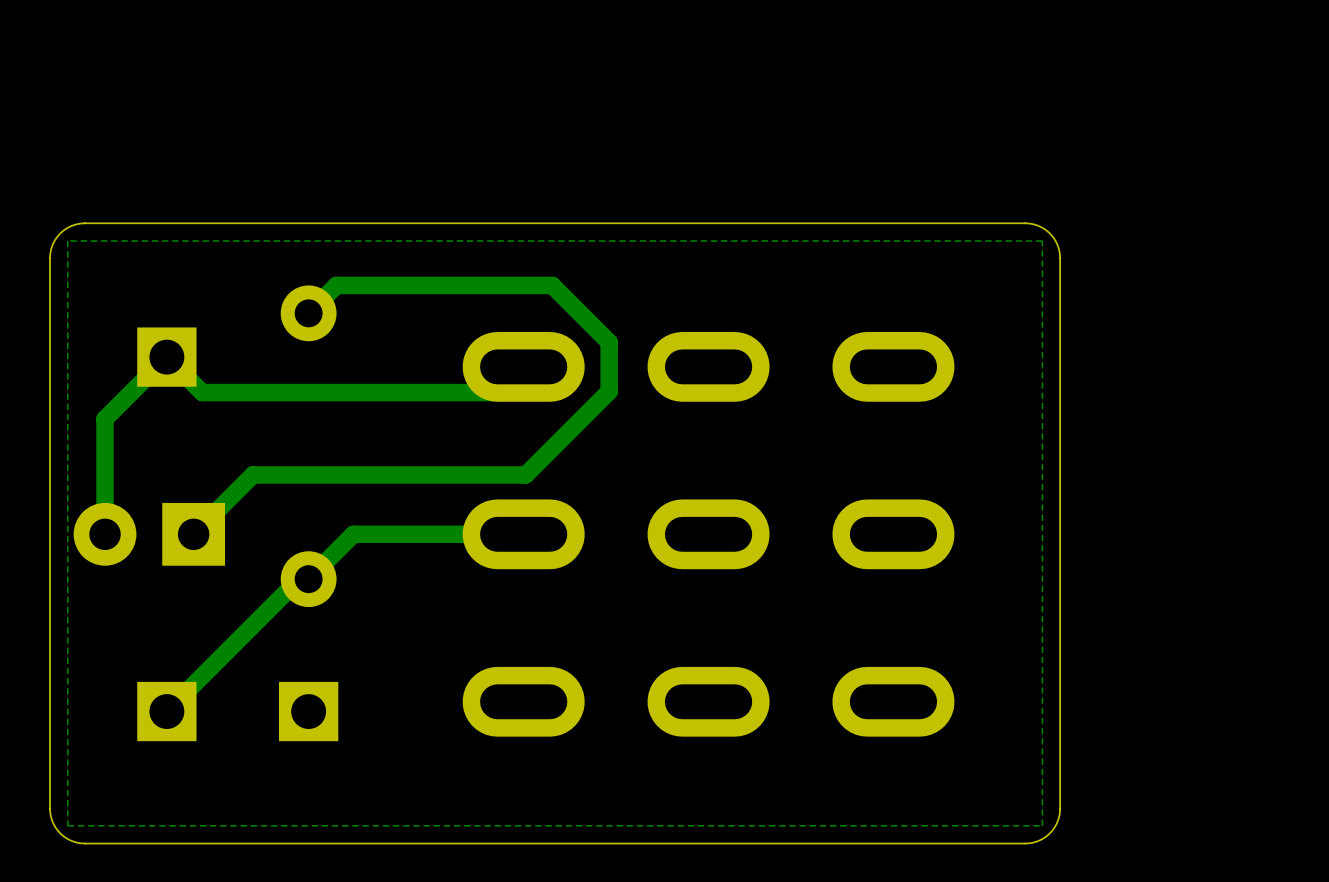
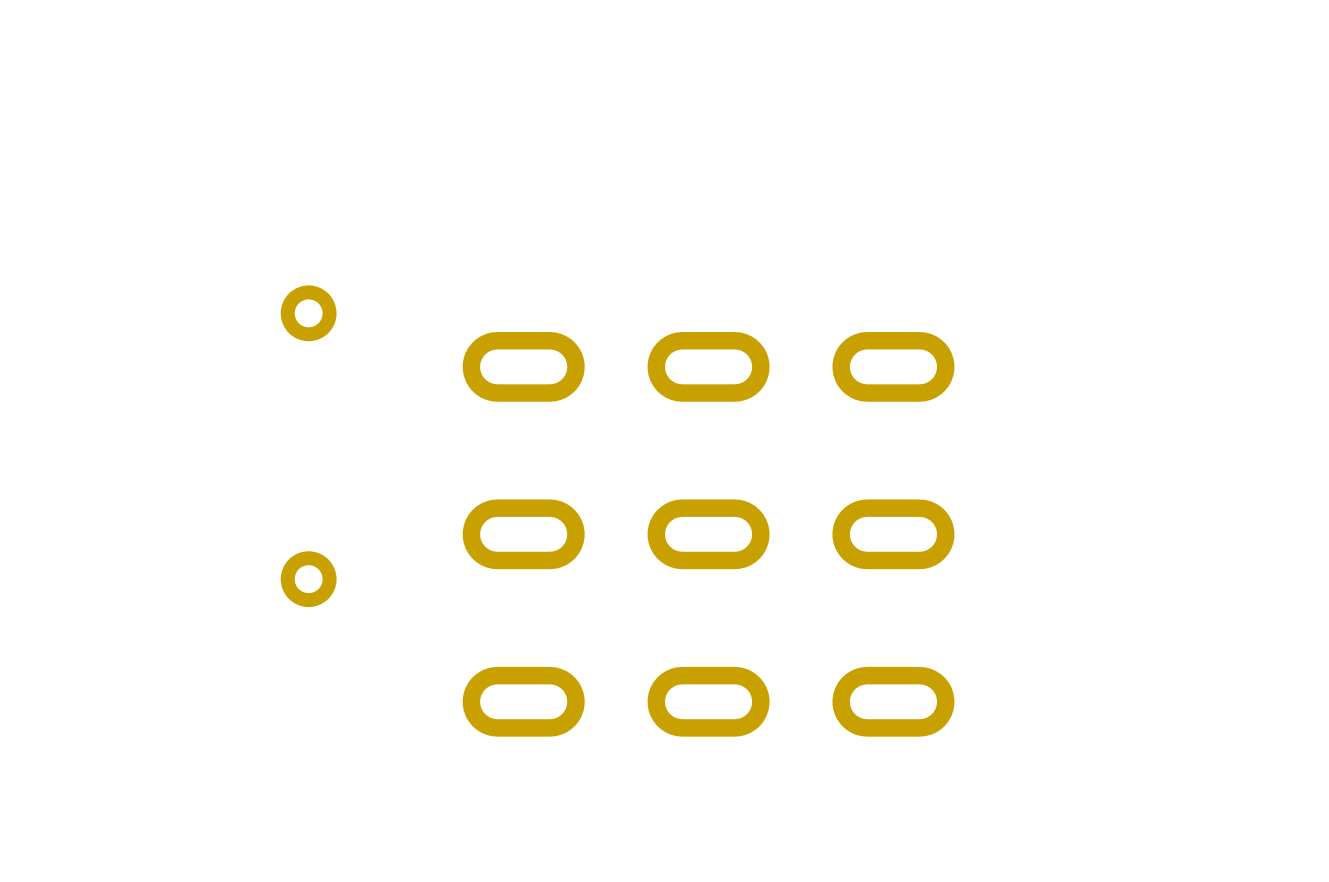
board edge: (1025, 223) (84, 223) (66, 228) (53, 243) (50, 258) (50, 808) (55, 827) (69, 840) (84, 843) (1025, 843) (1043, 838) (1054, 827) (1060, 808) (1060, 258) (1058, 246) (1049, 233) (1040, 226) (1025, 223) -> none
zone outline: (1042, 241) (67, 241) (67, 825) (1042, 825) (1042, 241) -> none
track: (308, 313) (336, 285) (552, 285) (609, 342) (609, 391) (525, 474) (252, 474) (193, 534) -> none
part: (166, 357) -> none
track: (523, 366) (498, 392) (202, 392) (166, 357) (105, 418) (105, 534) -> none
part: (149, 534) -> none
track: (523, 534) (353, 534) (308, 579) (299, 579) (166, 711) -> none
part: (166, 711) -> none
part: (308, 711) -> none

